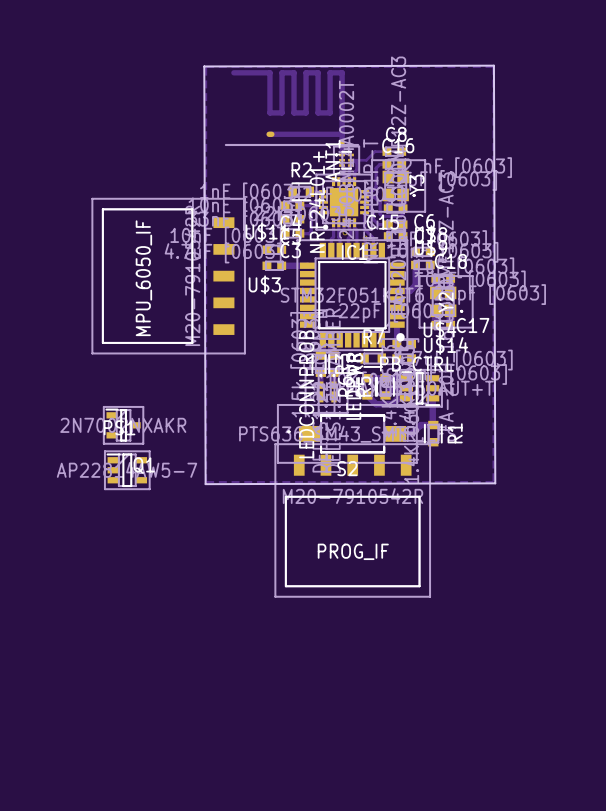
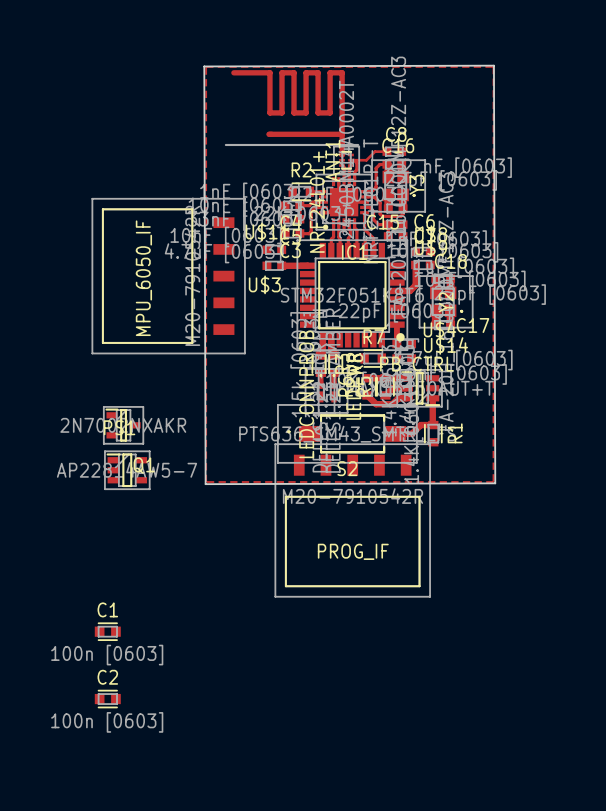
C1: none -> 100n [0603] (107, 631)
C2: none -> 100n [0603] (107, 699)

